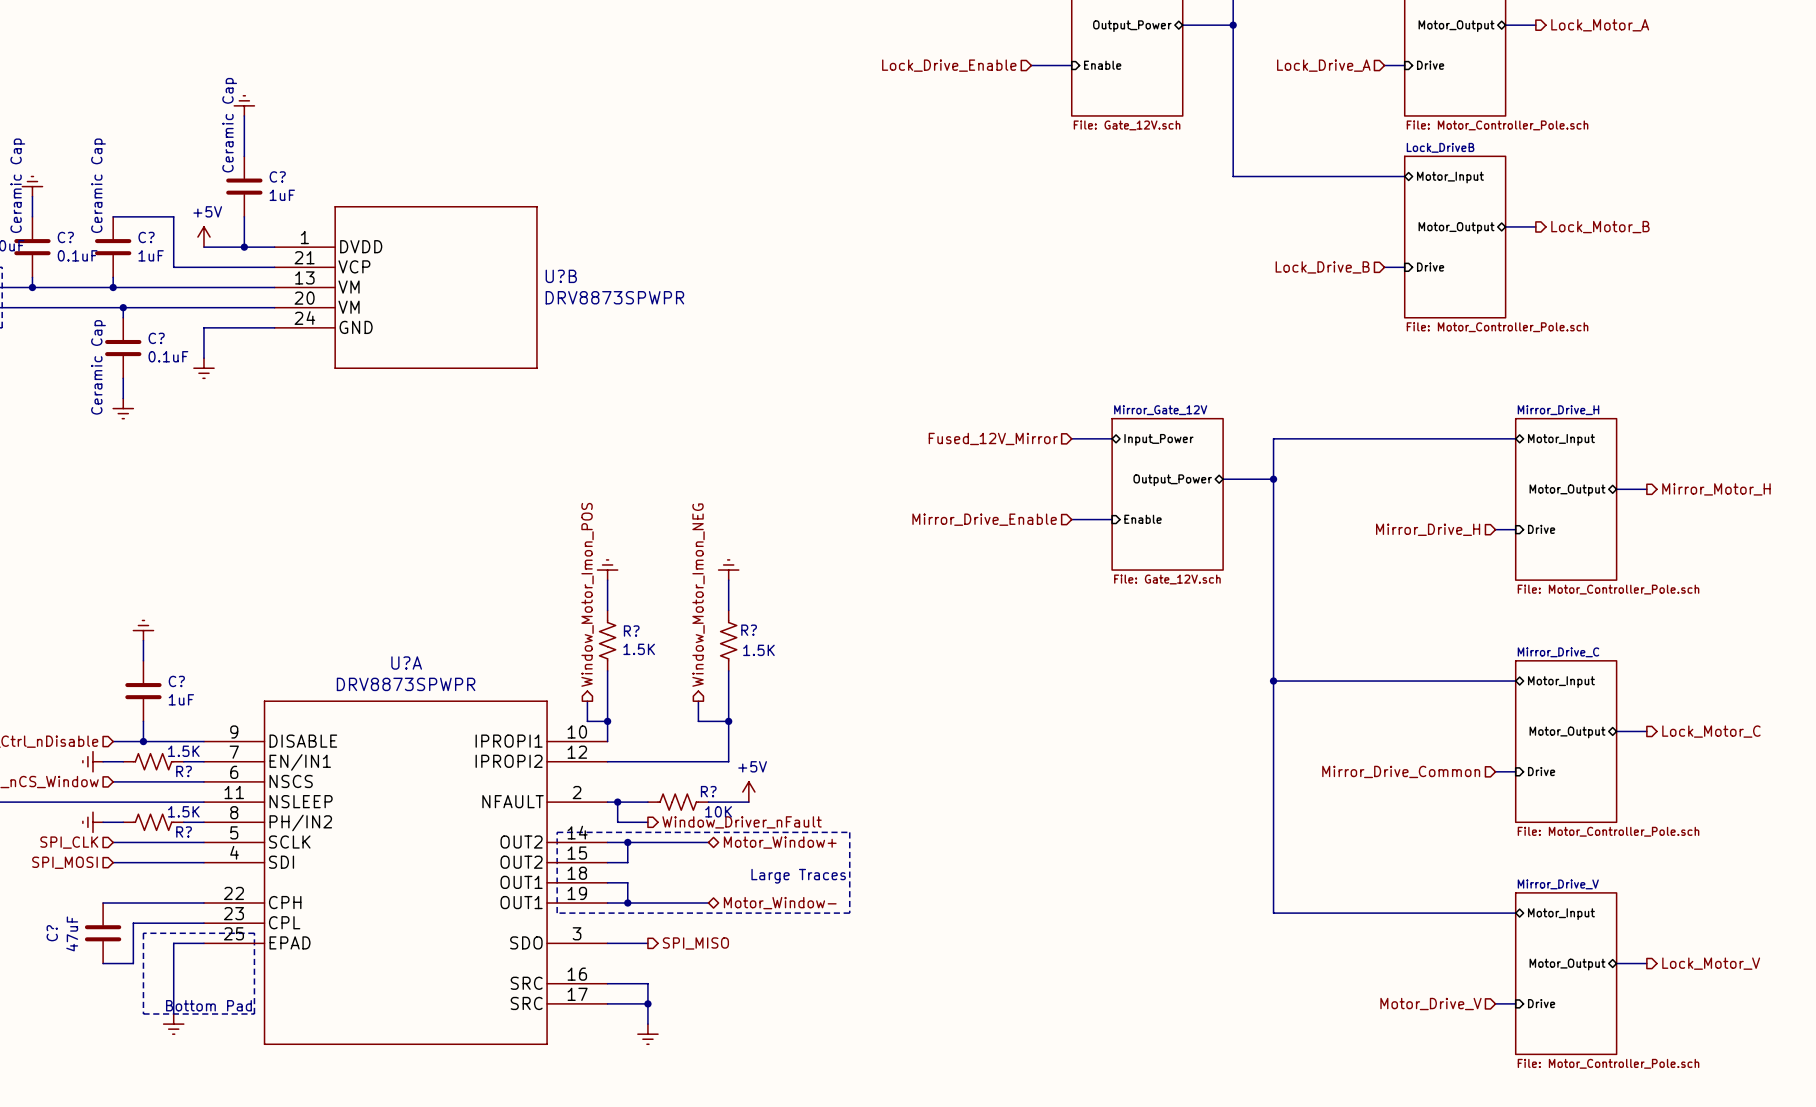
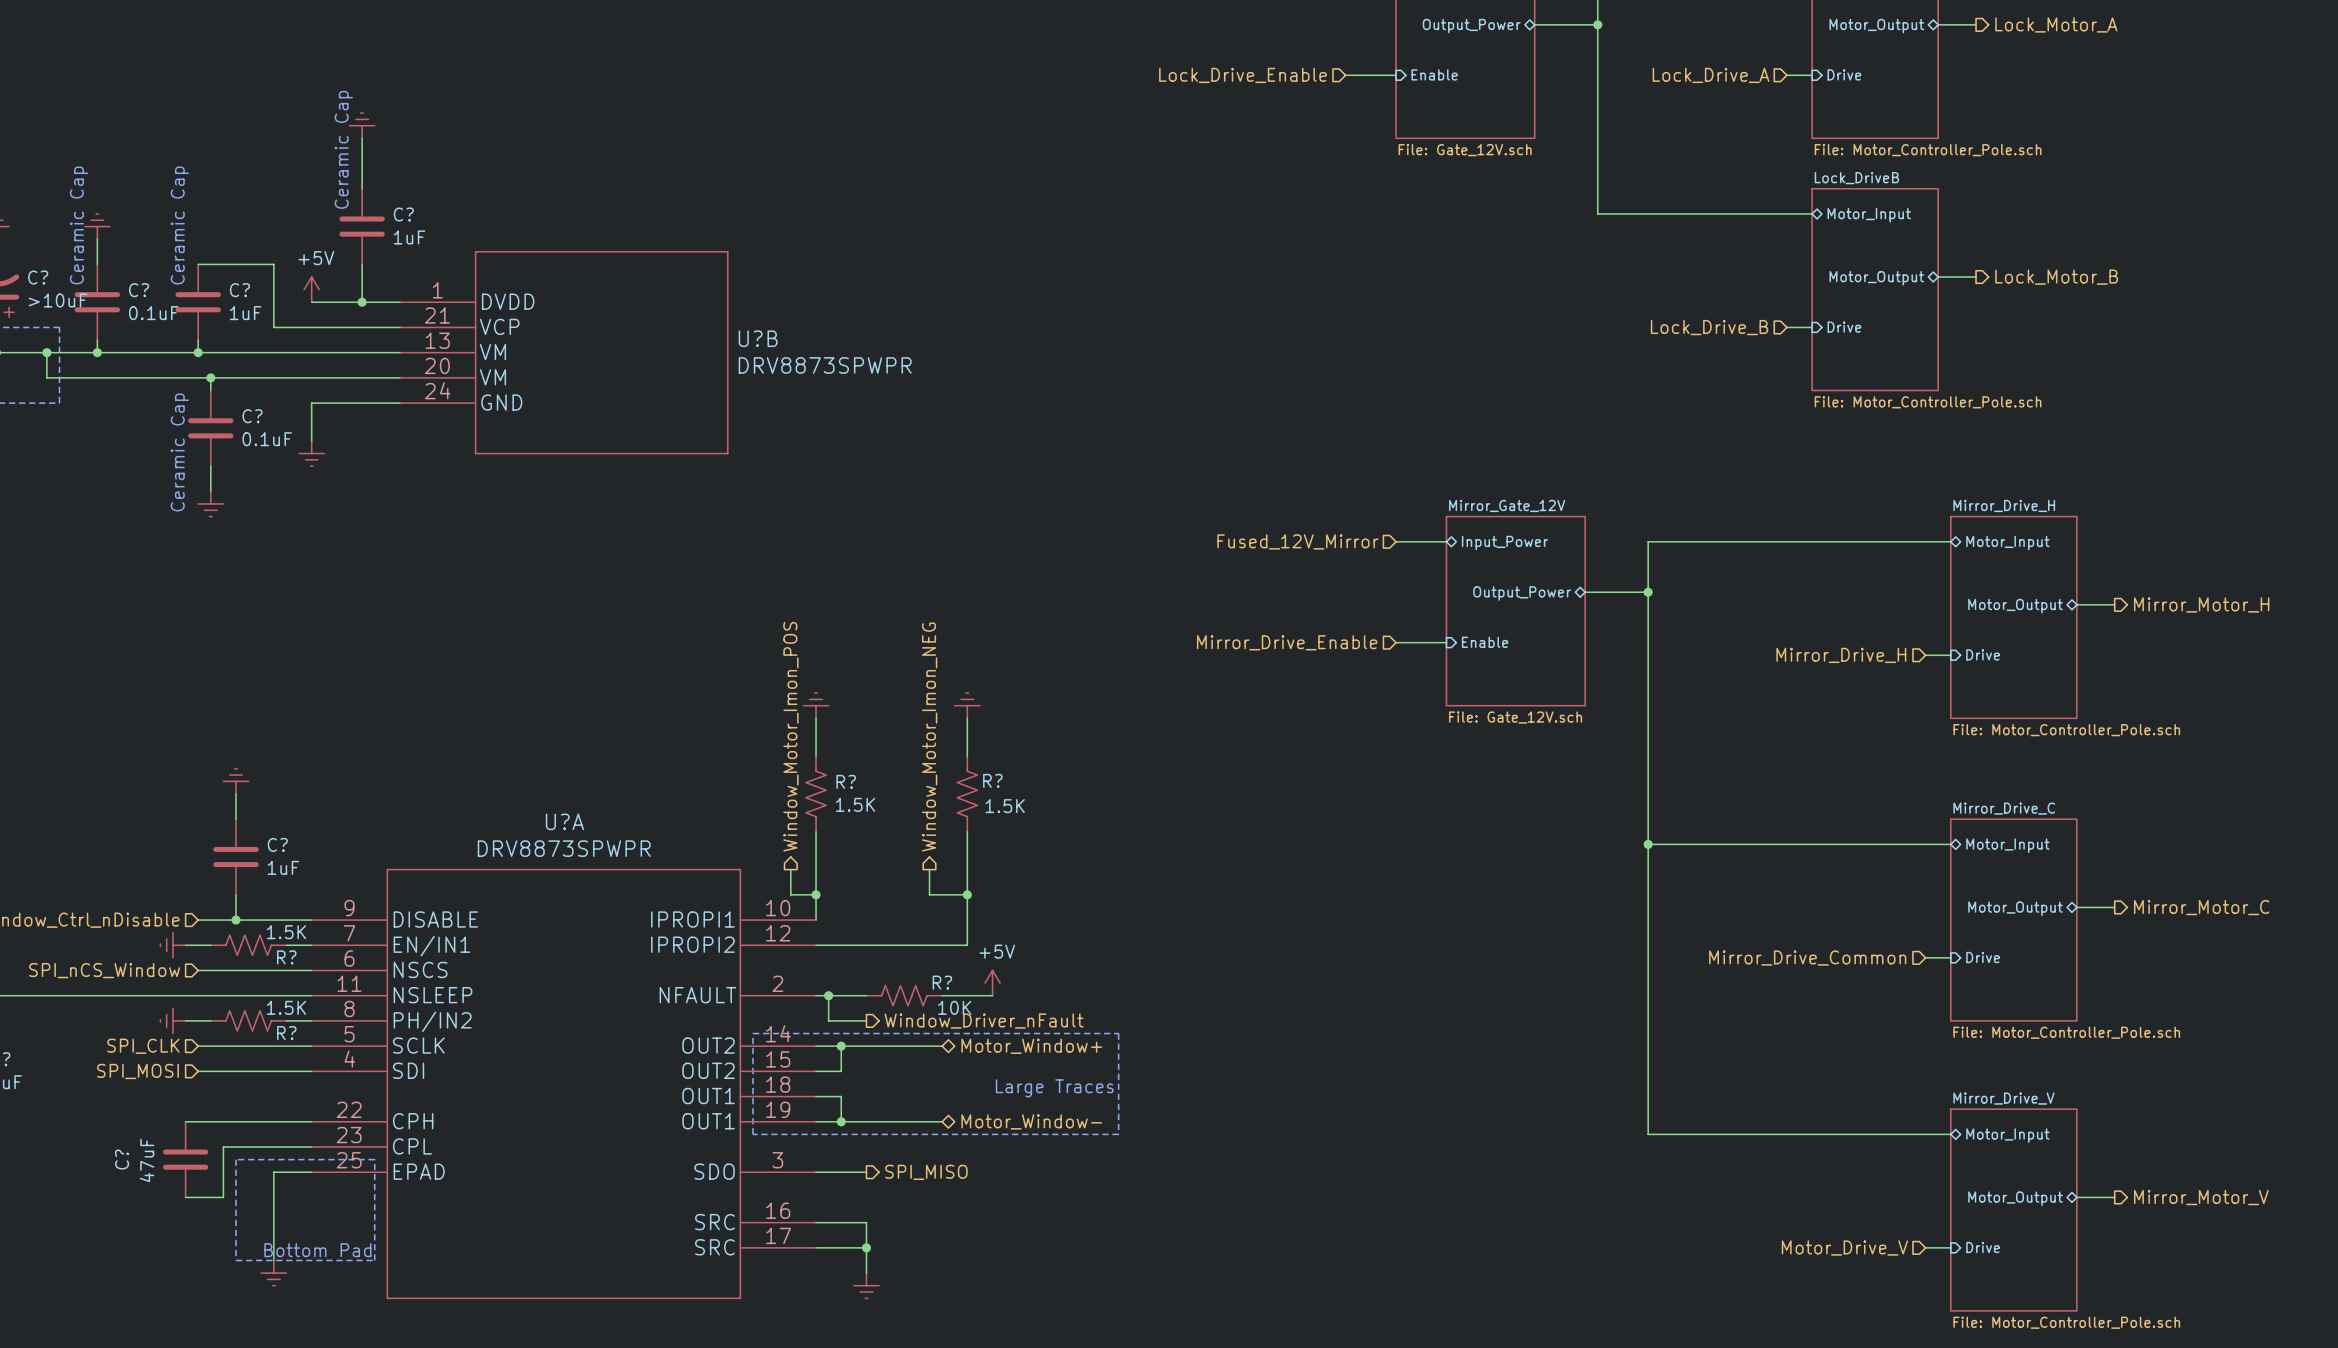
hierarchical label: Lock_Motor_C (1711, 731) -> Mirror_Motor_C (2201, 907)
hierarchical label: Lock_Motor_V (1711, 963) -> Mirror_Motor_V (2201, 1197)

